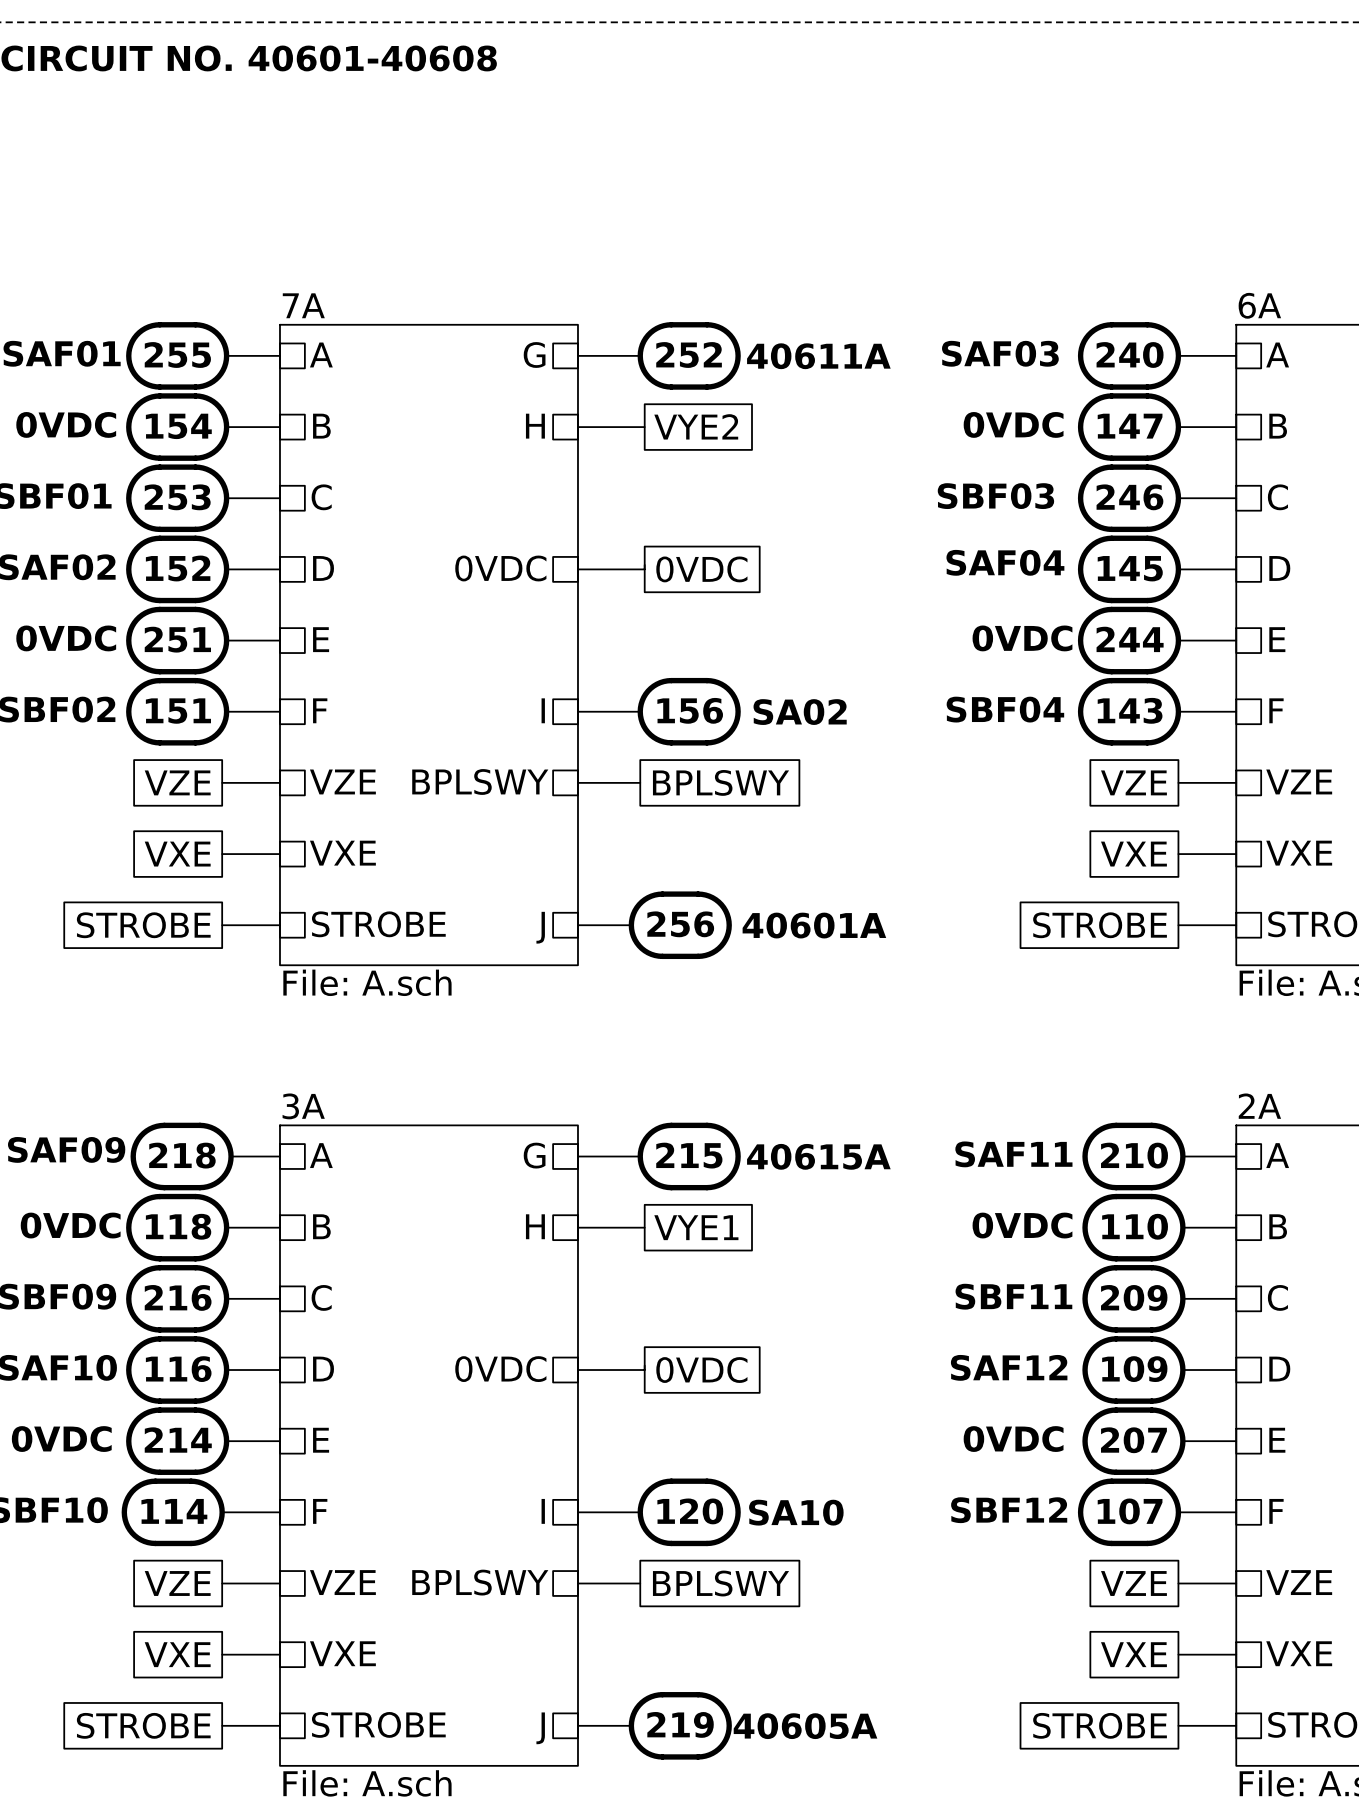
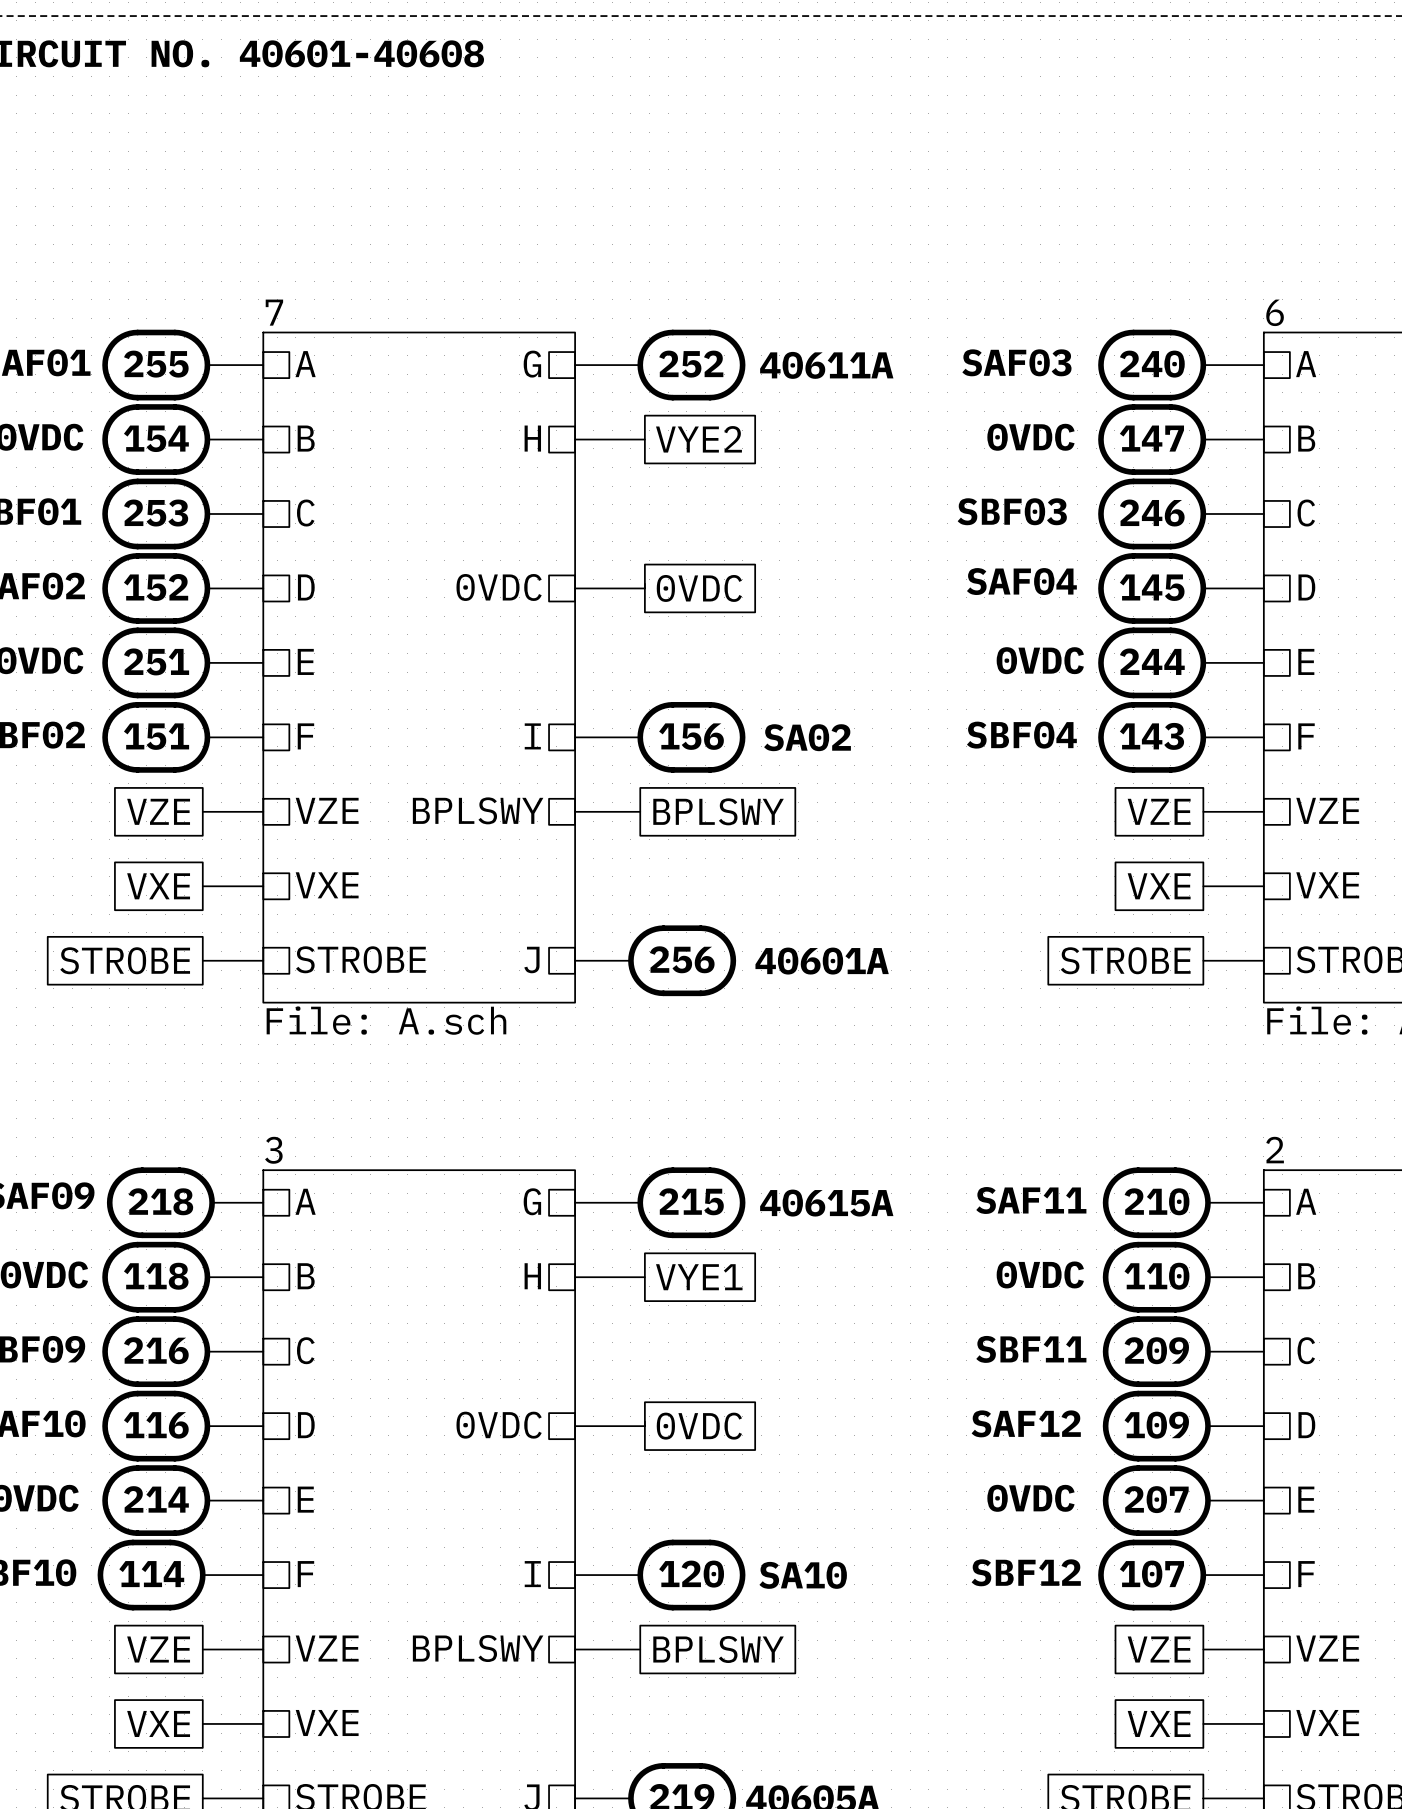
sheet 7A name: 7A (303, 305) -> 7 (274, 312)
sheet 6A name: 6A (1259, 305) -> 6 (1275, 312)
sheet 3A name: 3A (303, 1106) -> 3 (273, 1150)
sheet 2A name: 2A (1259, 1106) -> 2 (1275, 1150)

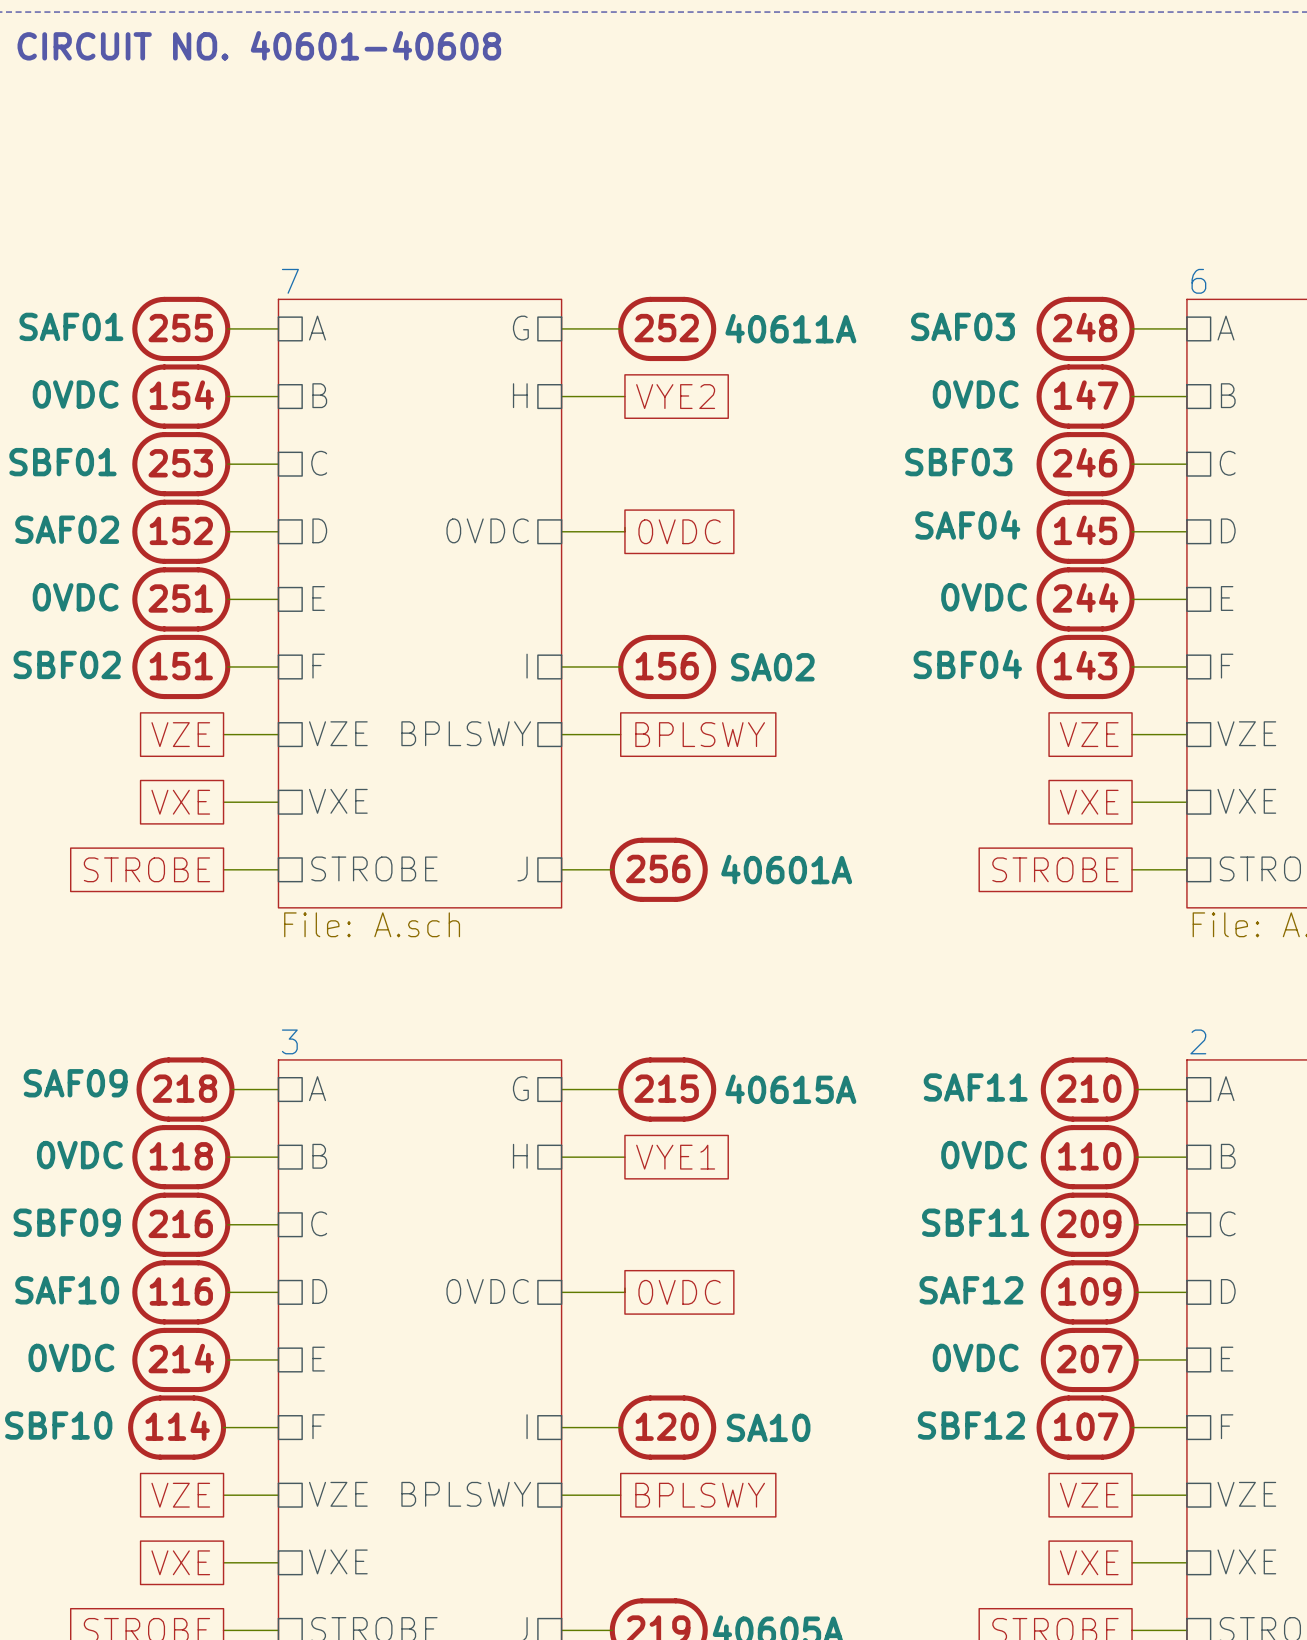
part text: 240 (1152, 364) -> 248 (1084, 327)

